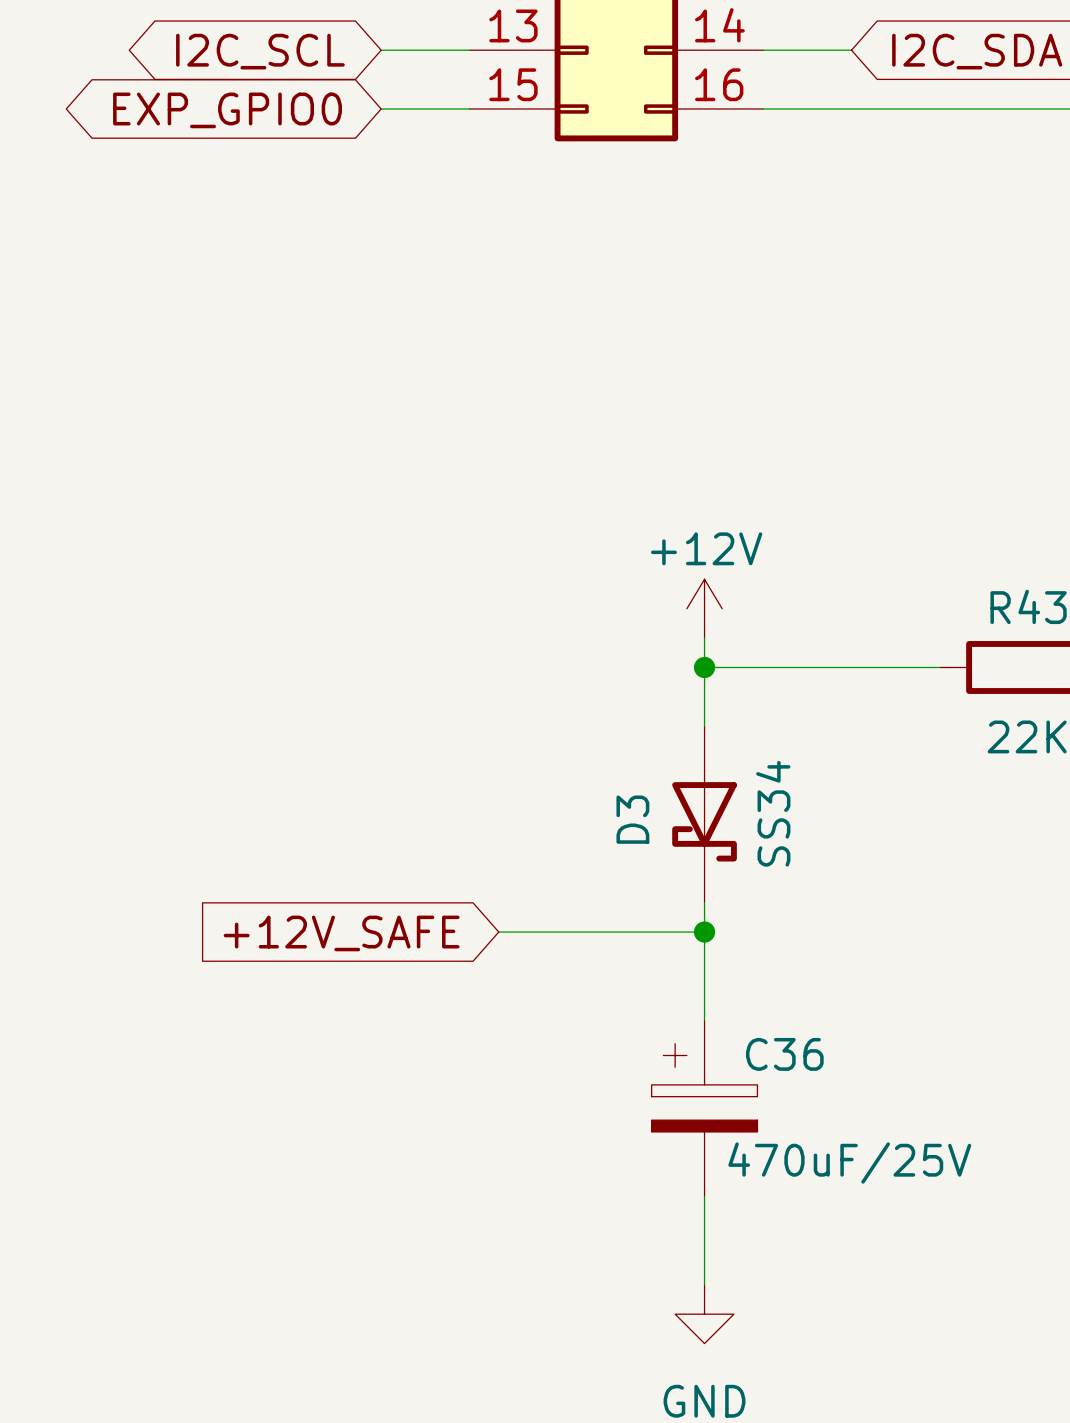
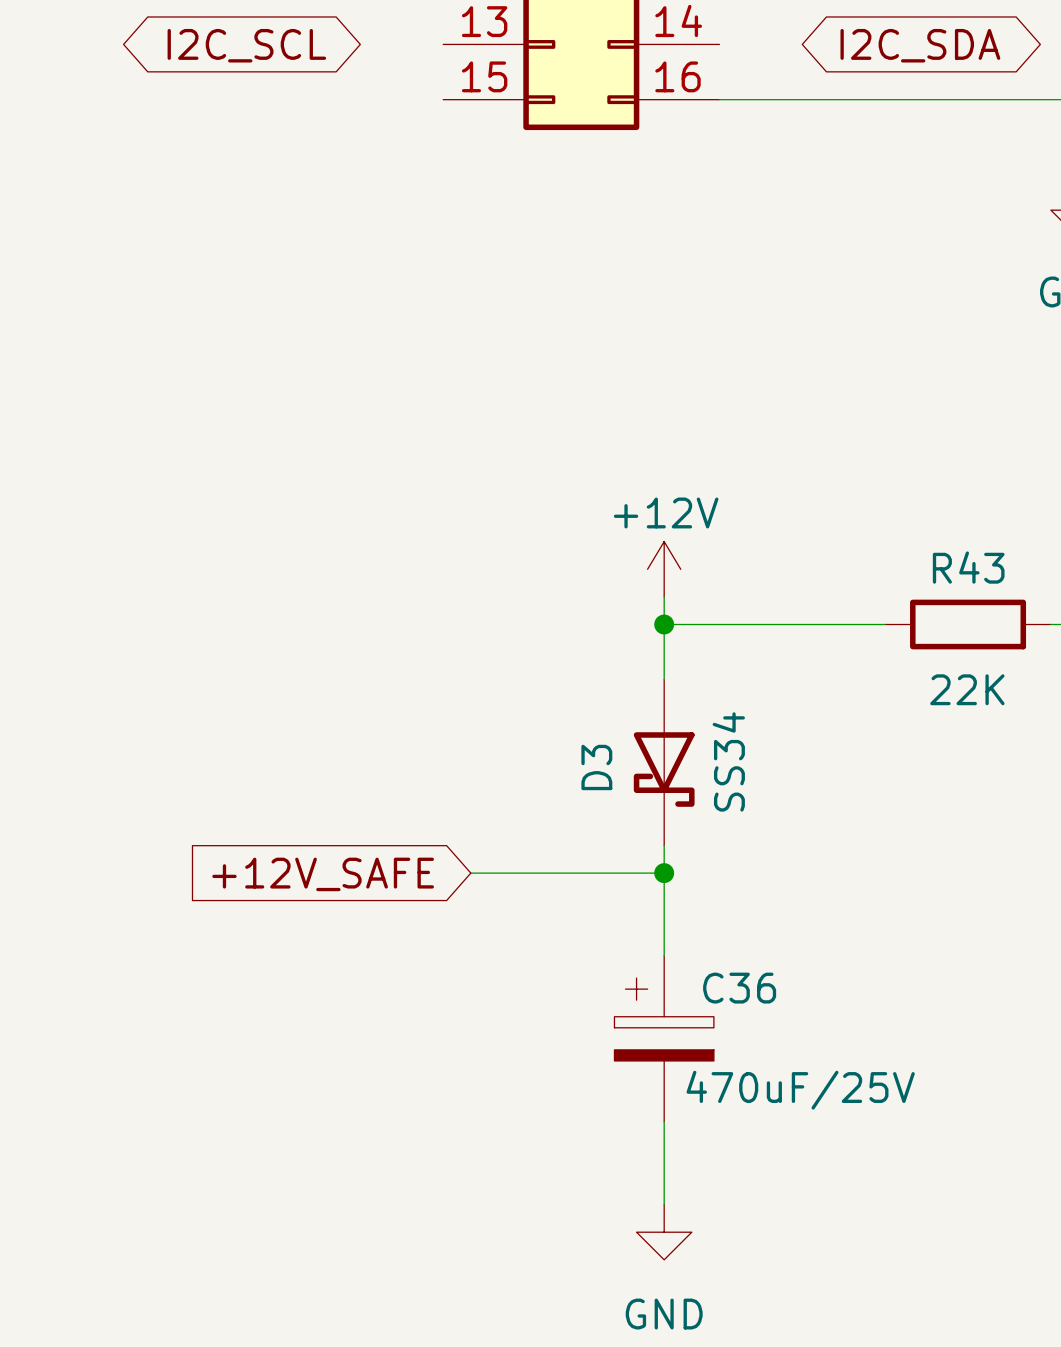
wire: (381, 50) (469, 50) -> none
wire: (763, 50) (851, 50) -> none
wire: (381, 109) (469, 109) -> none
global label: EXP_GPIO0 (227, 110) -> none

